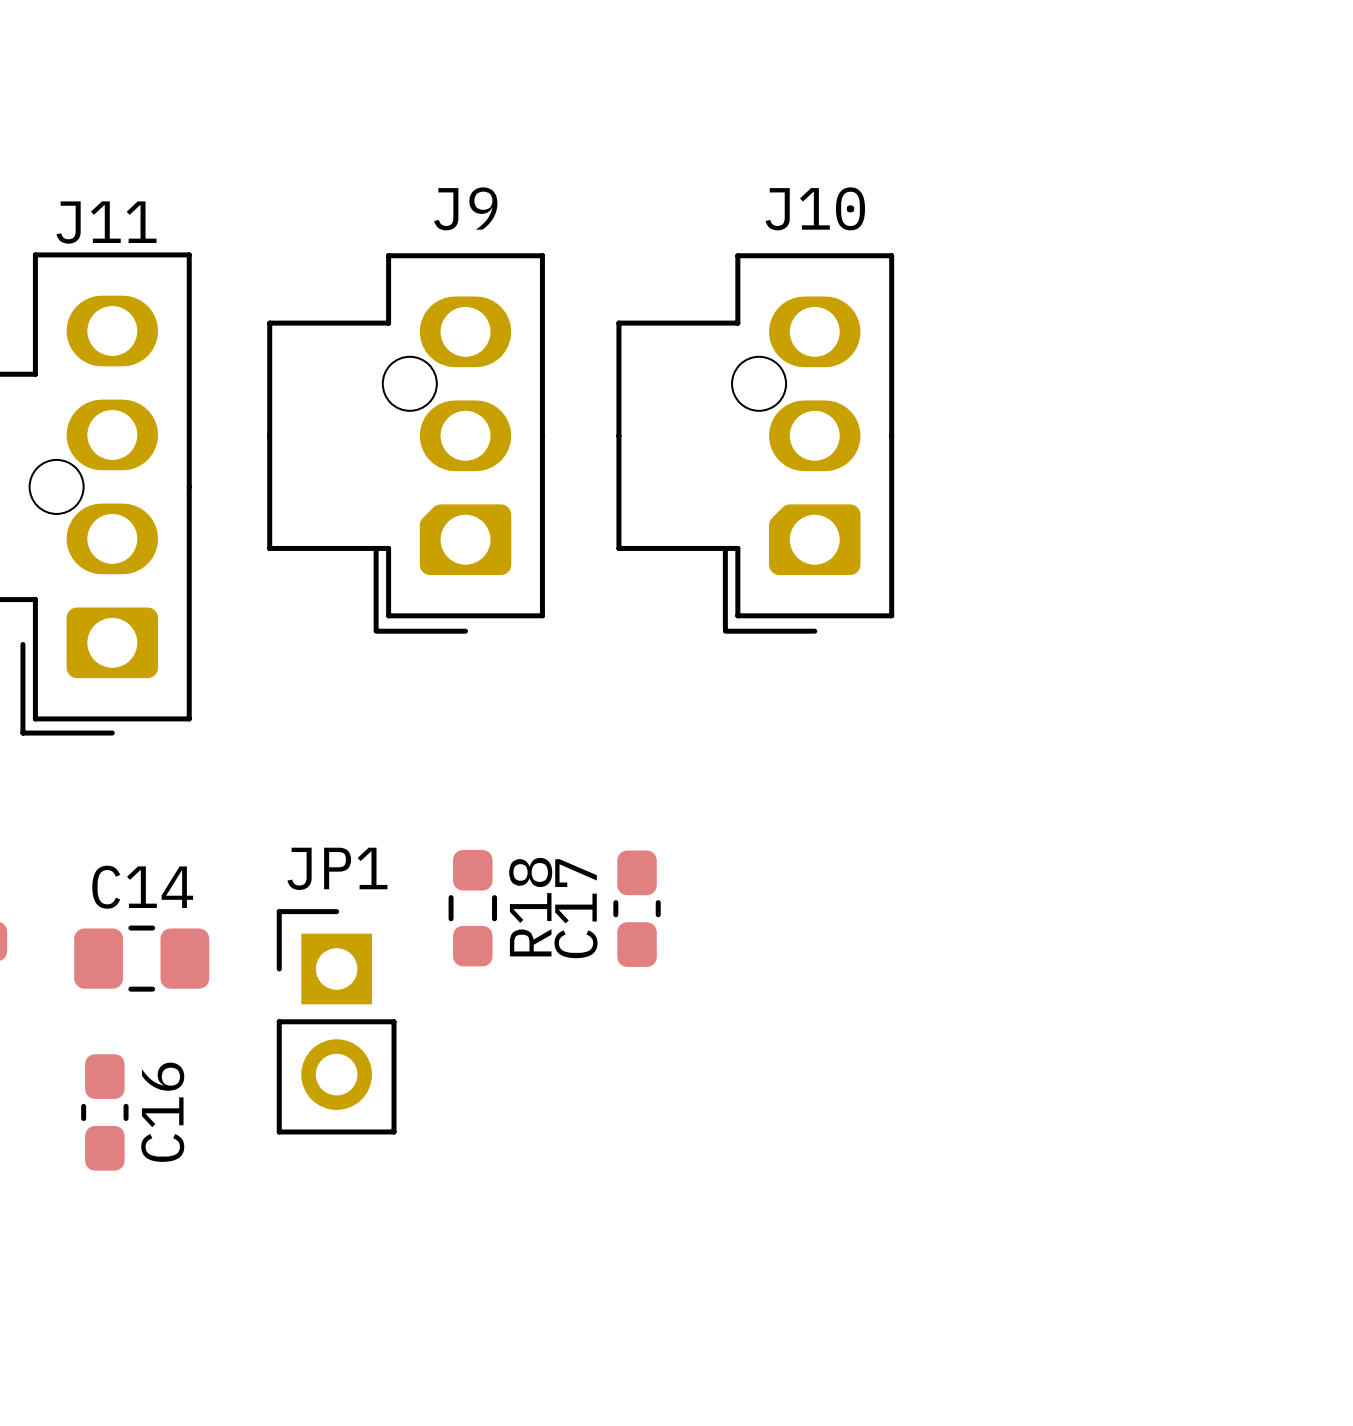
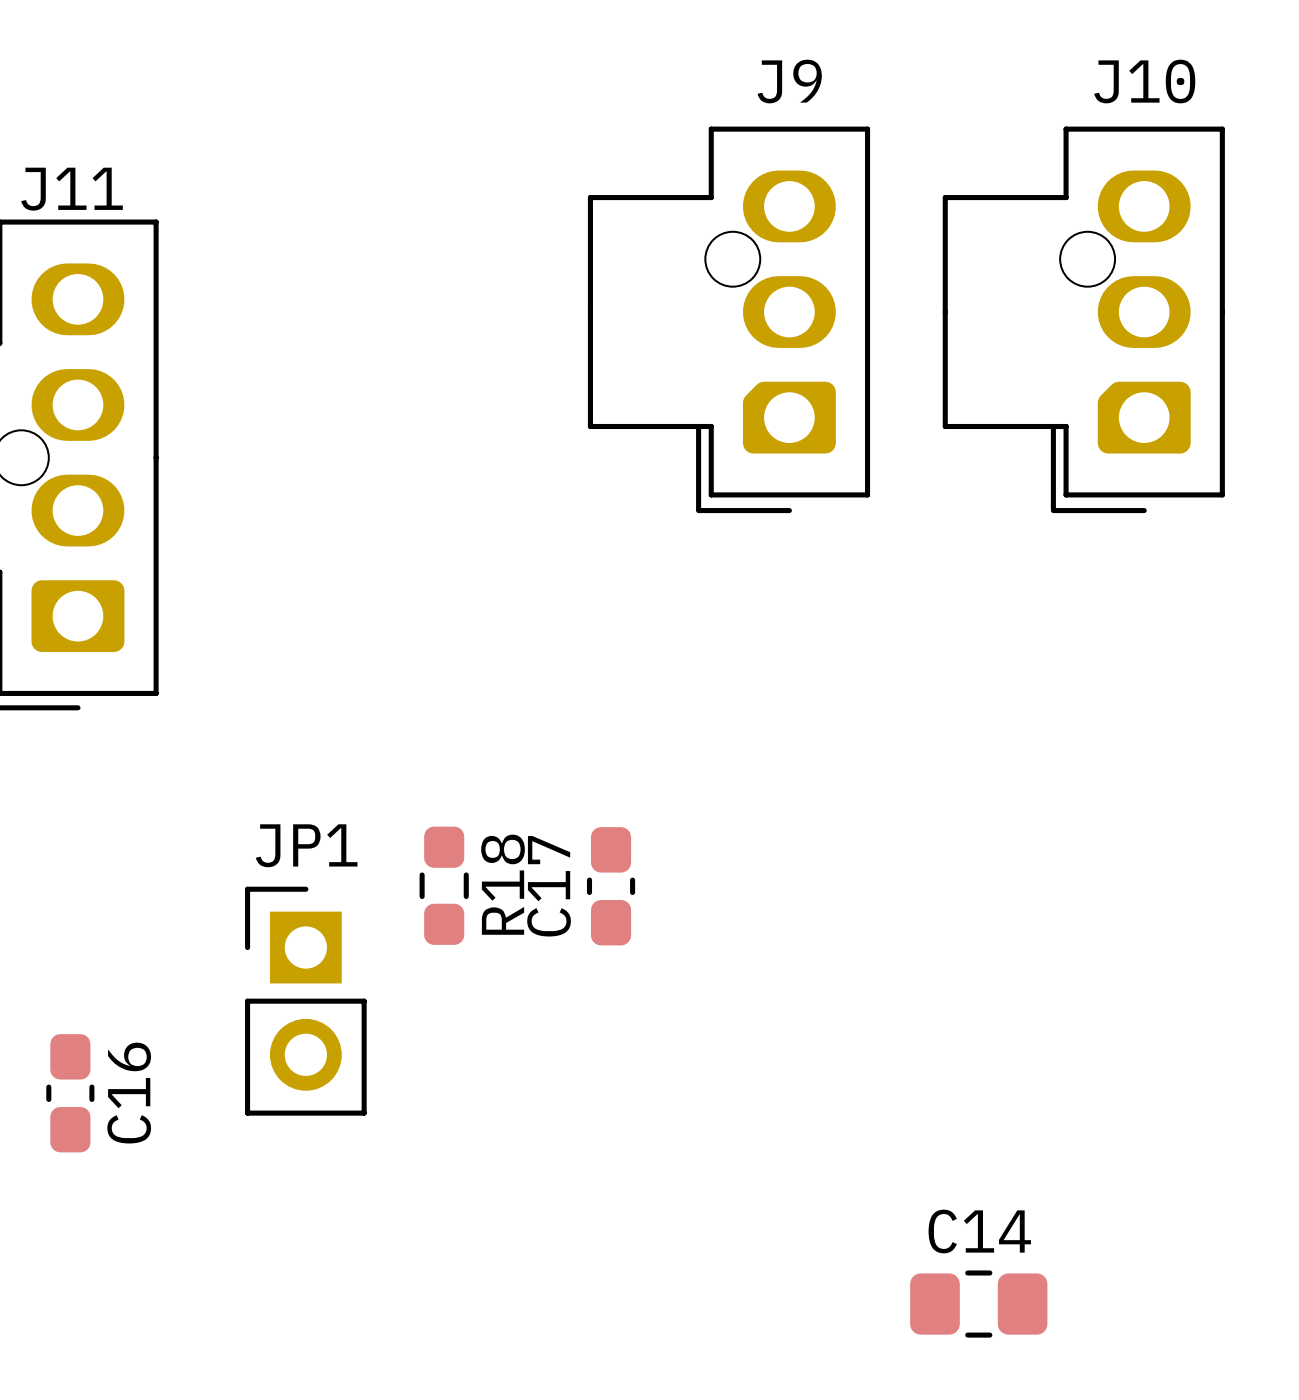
J9 position: (406, 443) -> (728, 319)
J10 position: (755, 443) -> (1083, 319)
C14 position: (141, 958) -> (978, 1304)

